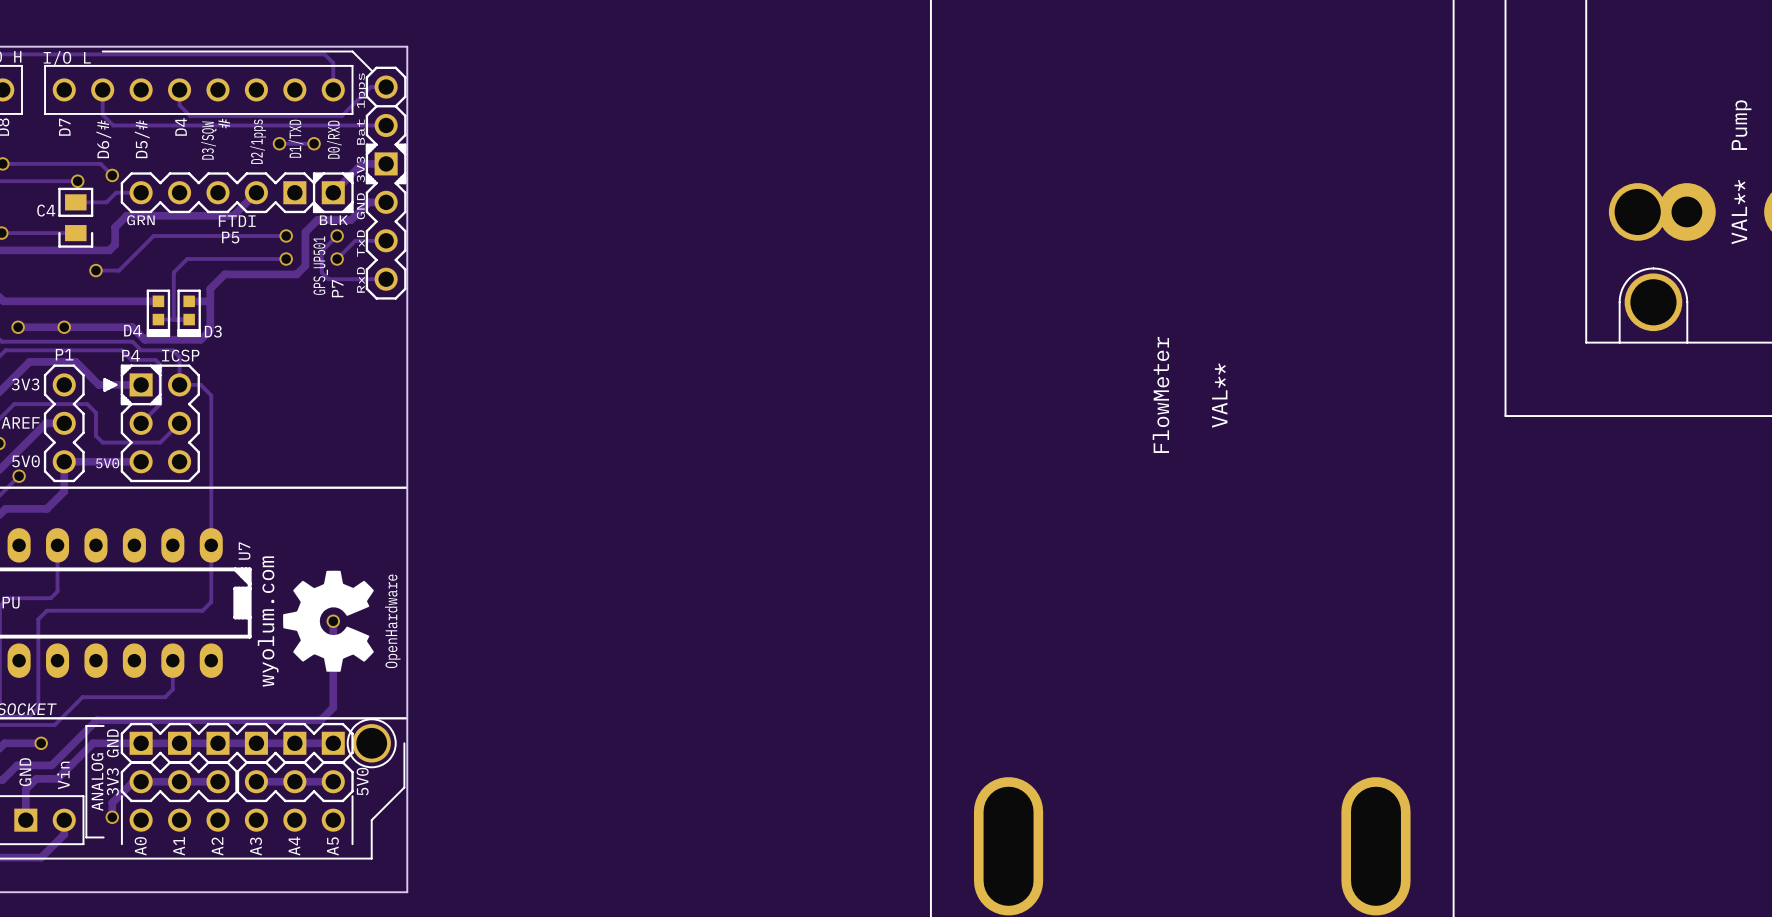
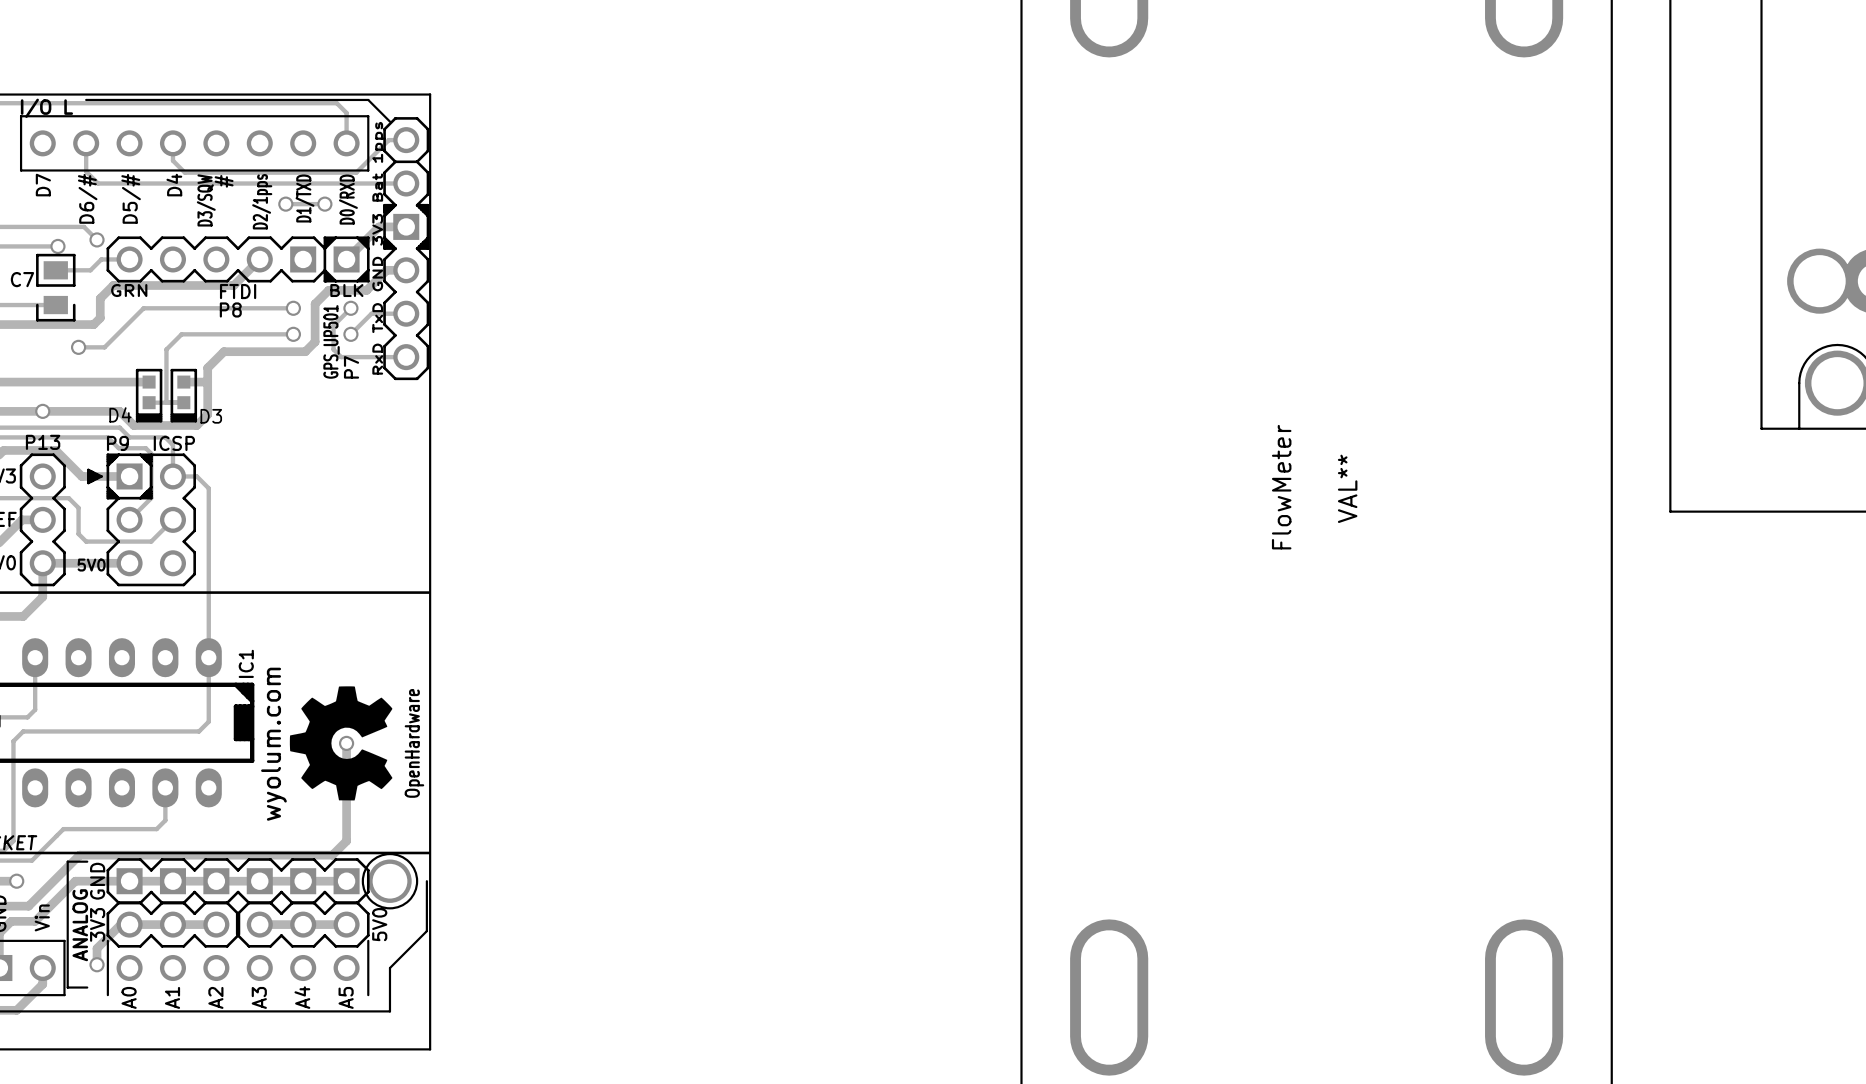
C4 name: C4 (46, 210) -> C7 (22, 279)
P5 name: P5 (230, 237) -> P8 (230, 309)
P1 name: P1 (64, 354) -> P13 (43, 442)
P4 name: P4 (130, 355) -> P9 (117, 443)
U7 name: U7 (244, 551) -> IC1 (246, 663)

